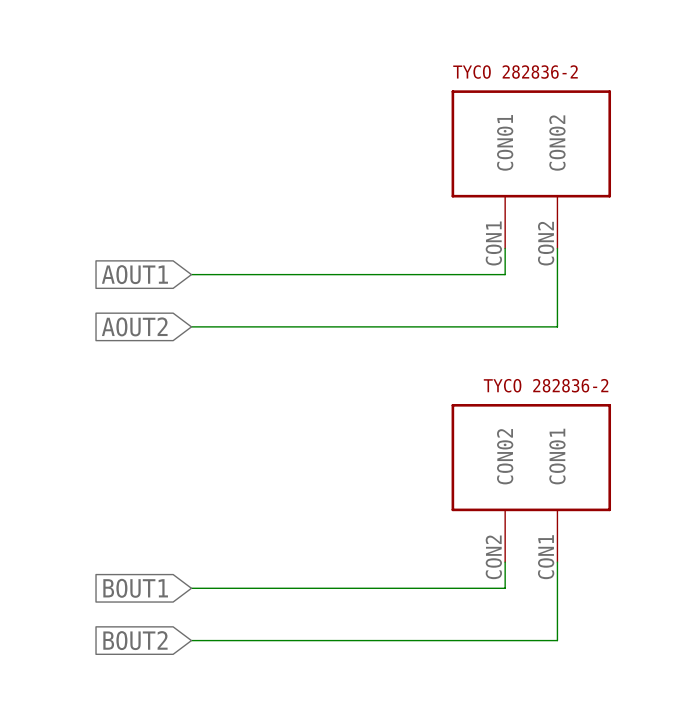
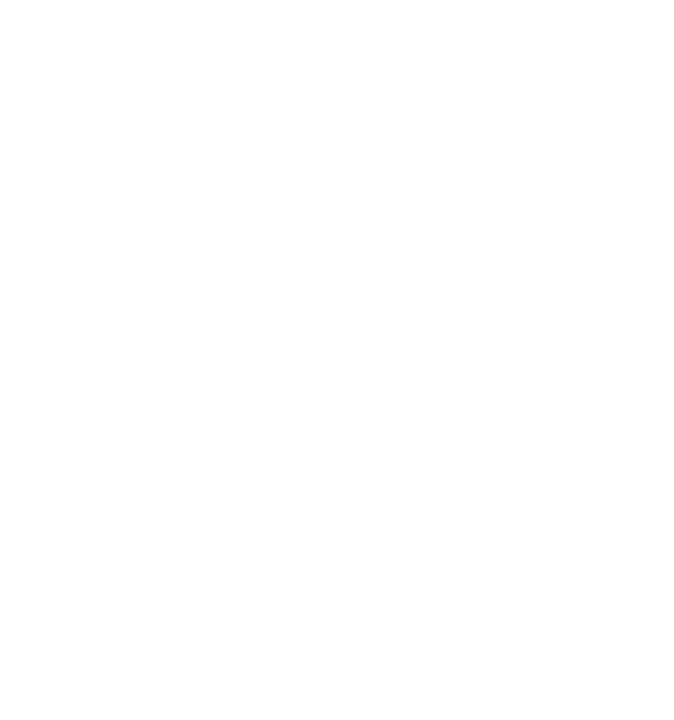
part: (531, 169) -> none
wire: (505, 248) (505, 274) (191, 274) -> none
wire: (557, 248) (557, 326) (191, 326) -> none
global label: AOUT1 (134, 274) -> none
global label: AOUT2 (134, 326) -> none
part: (531, 483) -> none
wire: (505, 562) (505, 588) (191, 588) -> none
wire: (557, 562) (557, 640) (191, 640) -> none
global label: BOUT1 (135, 588) -> none
global label: BOUT2 (135, 640) -> none

